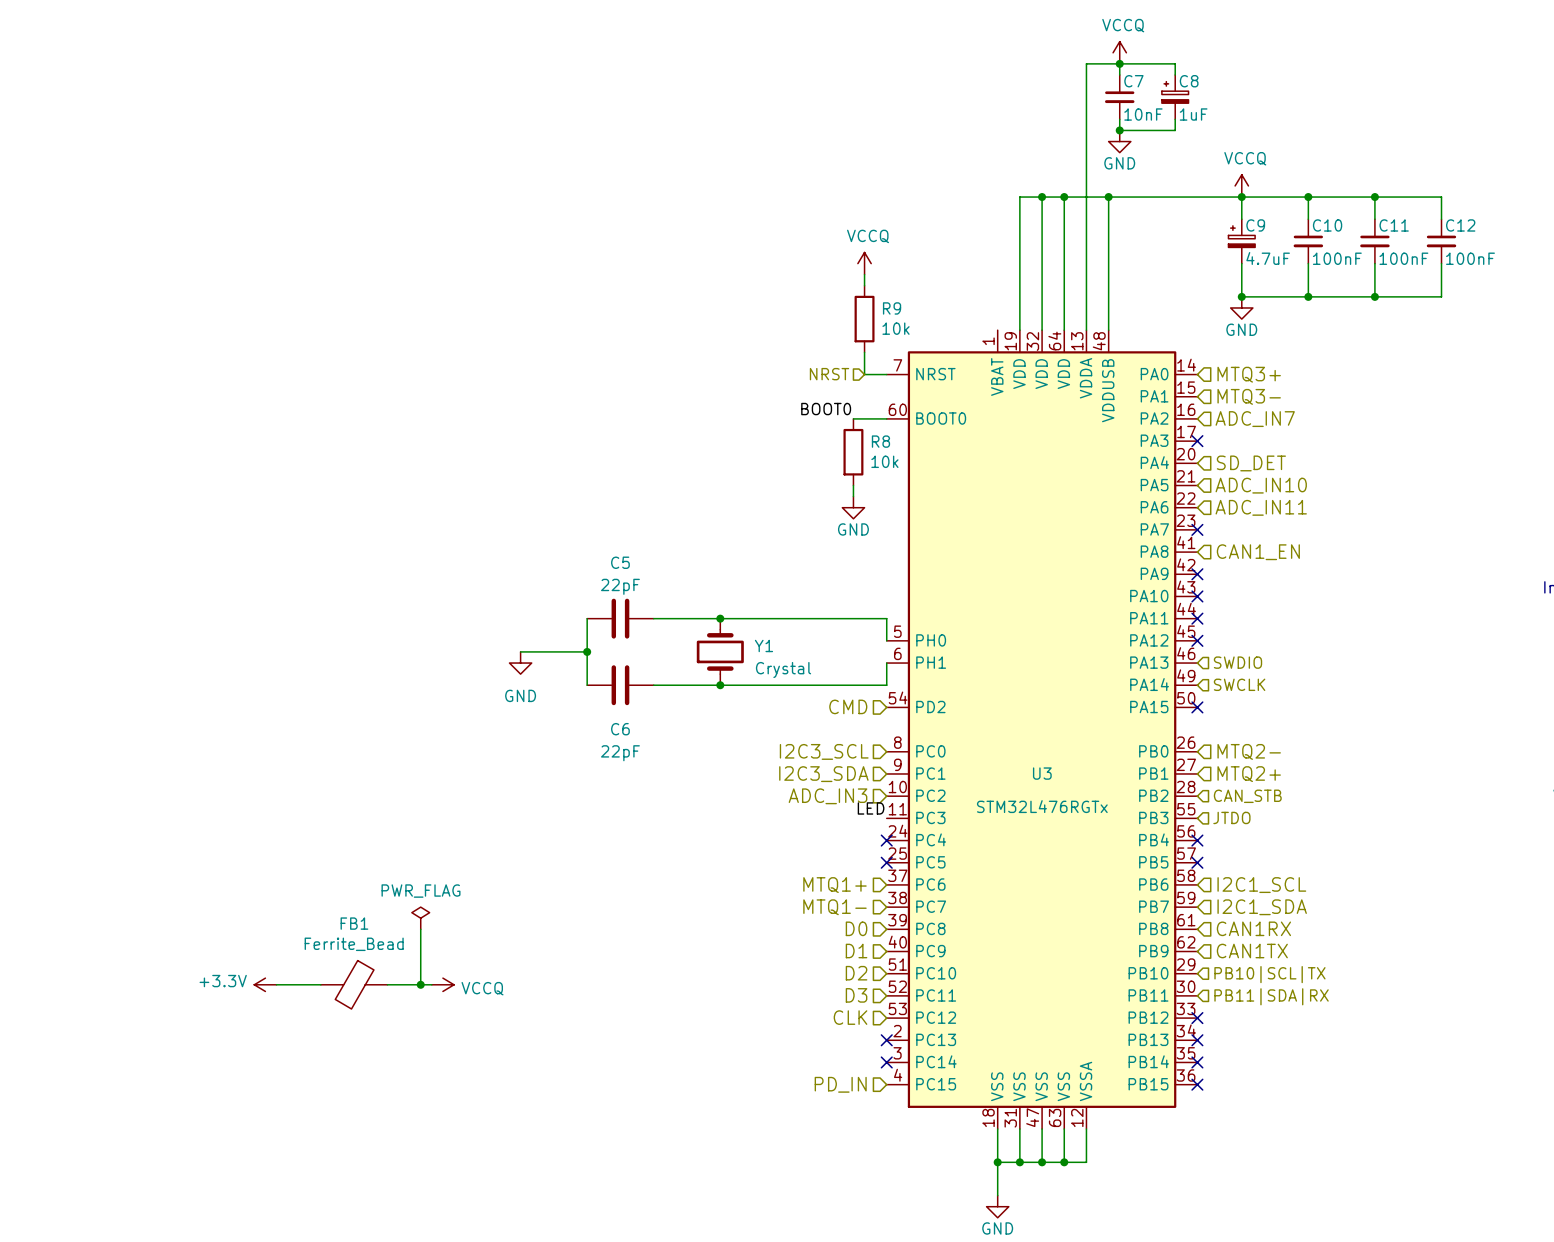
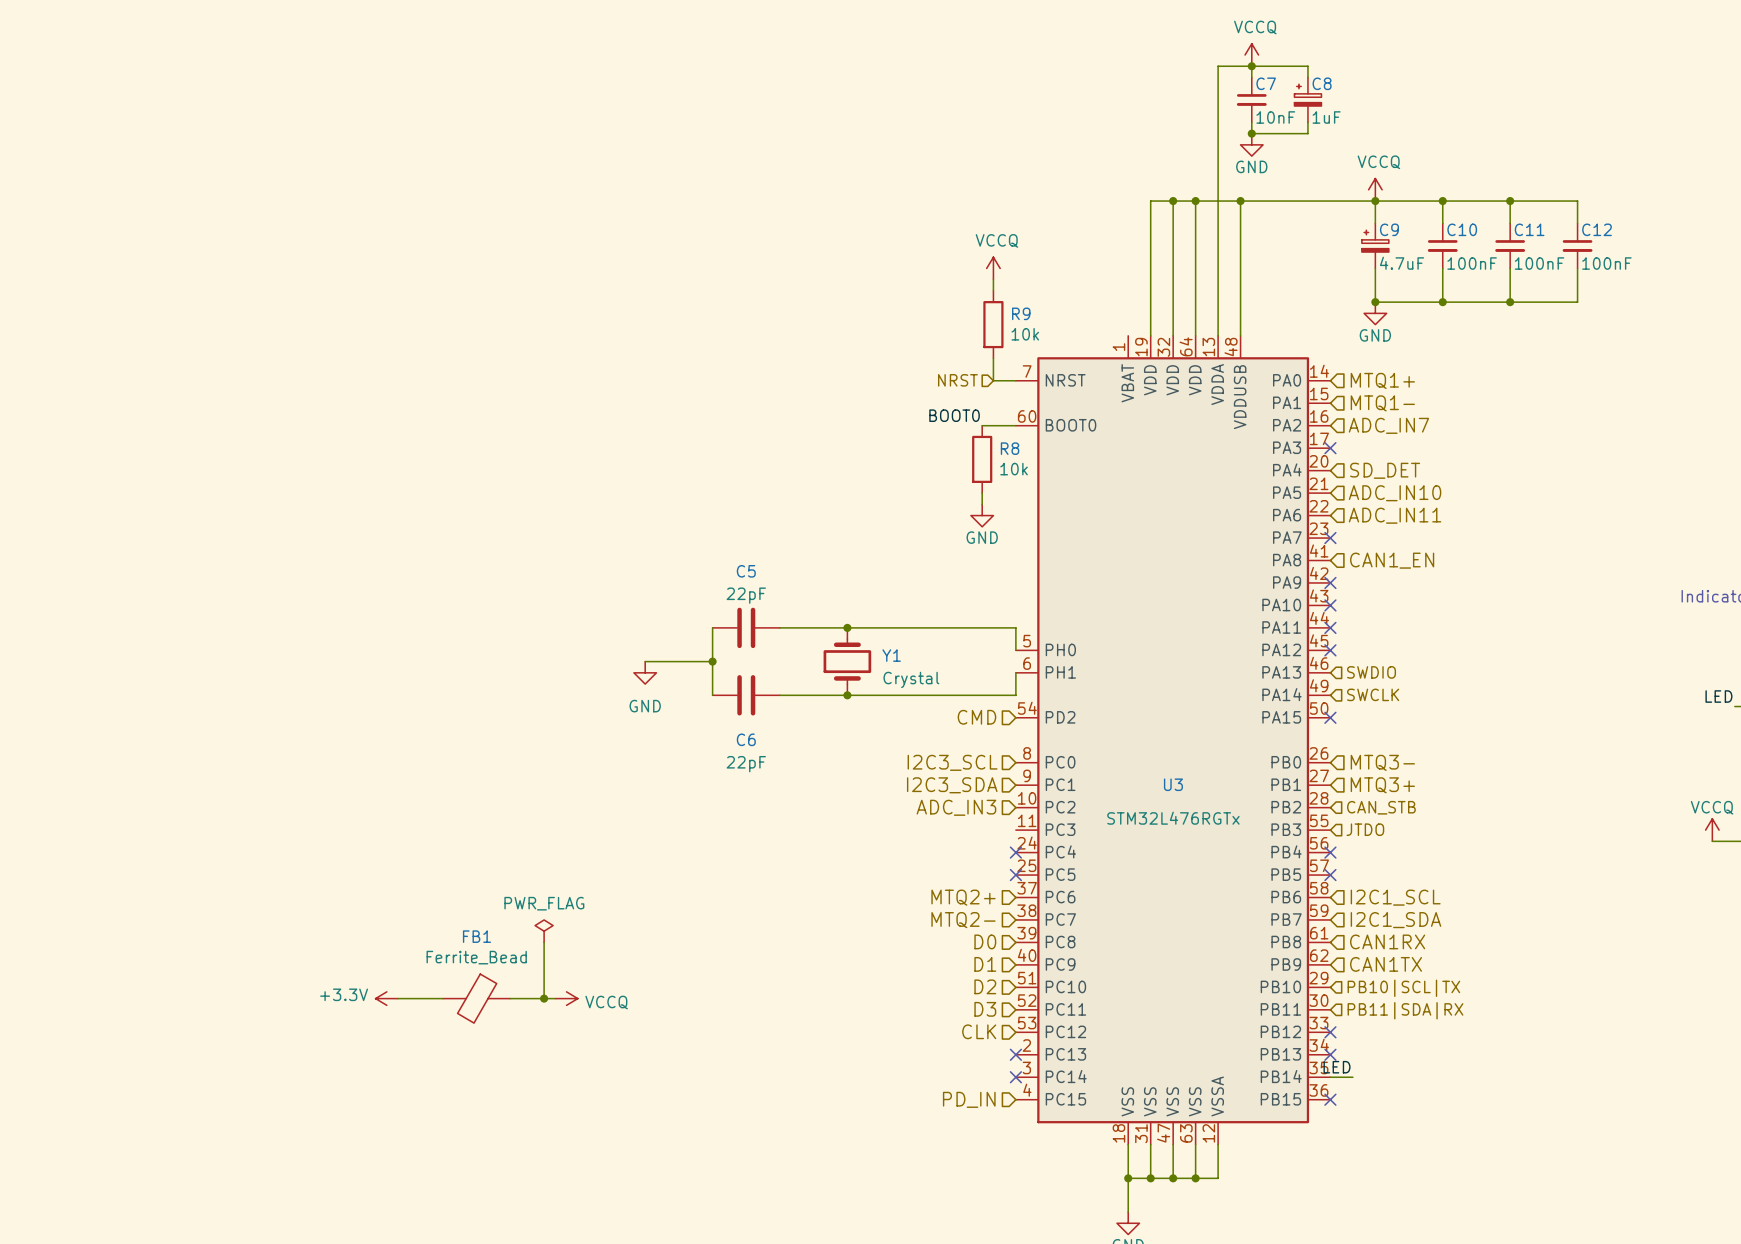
hierarchical label: MTQ3+ (1249, 374) -> MTQ1+ (1382, 380)
hierarchical label: MTQ3- (1249, 396) -> MTQ1- (1382, 403)
hierarchical label: MTQ2- (1249, 751) -> MTQ3- (1382, 762)
hierarchical label: MTQ2+ (1249, 774) -> MTQ3+ (1382, 785)
label: LED (871, 808) -> none
hierarchical label: MTQ1+ (834, 885) -> MTQ2+ (963, 897)
hierarchical label: MTQ1- (834, 907) -> MTQ2- (963, 920)
label: none -> LED (1337, 1067)
wire: none -> (1330, 1077) (1352, 1077)
no-connect mark: (1197, 1062) -> none

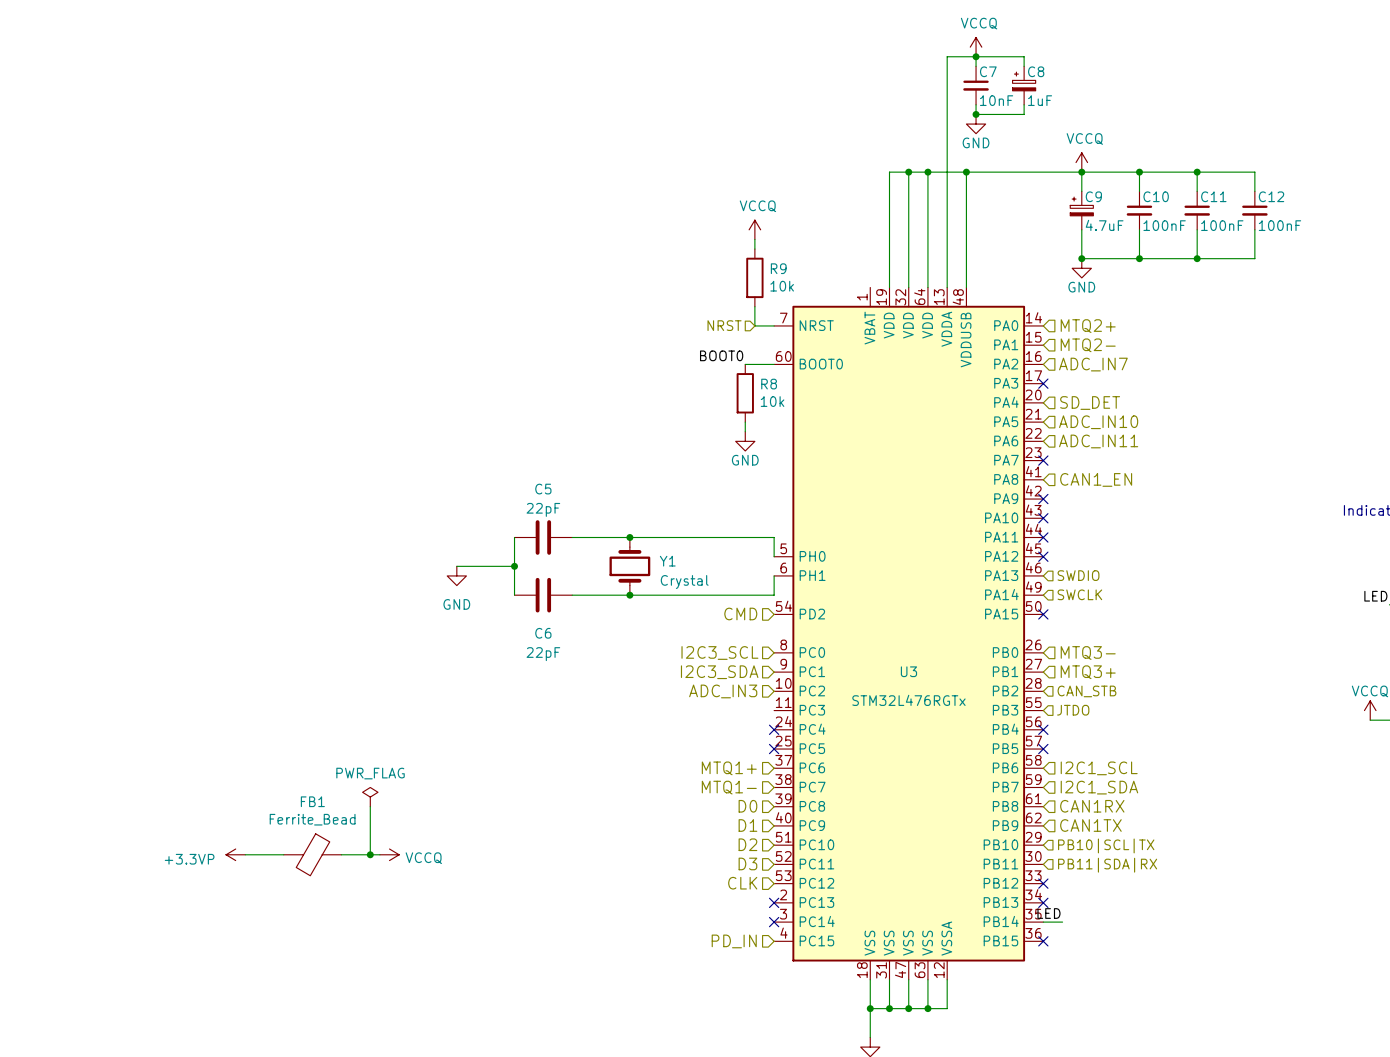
hierarchical label: MTQ1+ (1382, 380) -> MTQ2+ (1088, 326)
hierarchical label: MTQ1- (1382, 403) -> MTQ2- (1088, 345)
hierarchical label: MTQ2+ (963, 897) -> MTQ1+ (729, 768)
hierarchical label: MTQ2- (963, 920) -> MTQ1- (729, 787)
power symbol: +3.3V (386, 998) -> +3.3VP (235, 854)

